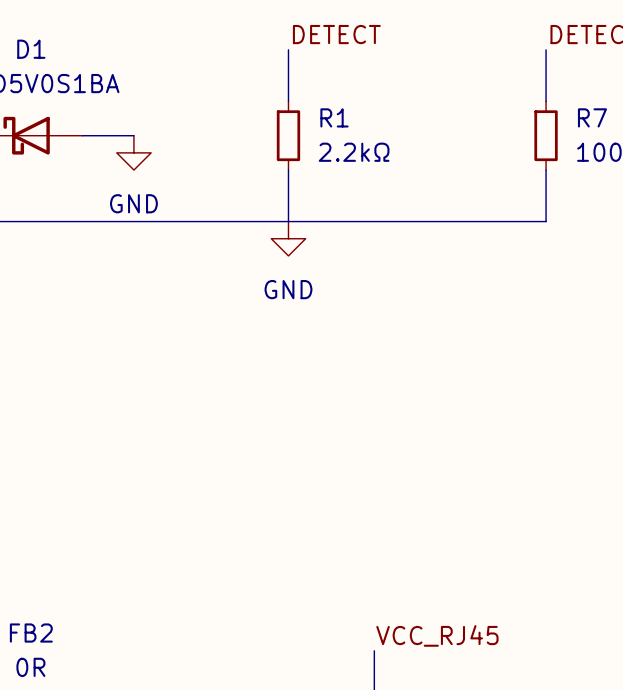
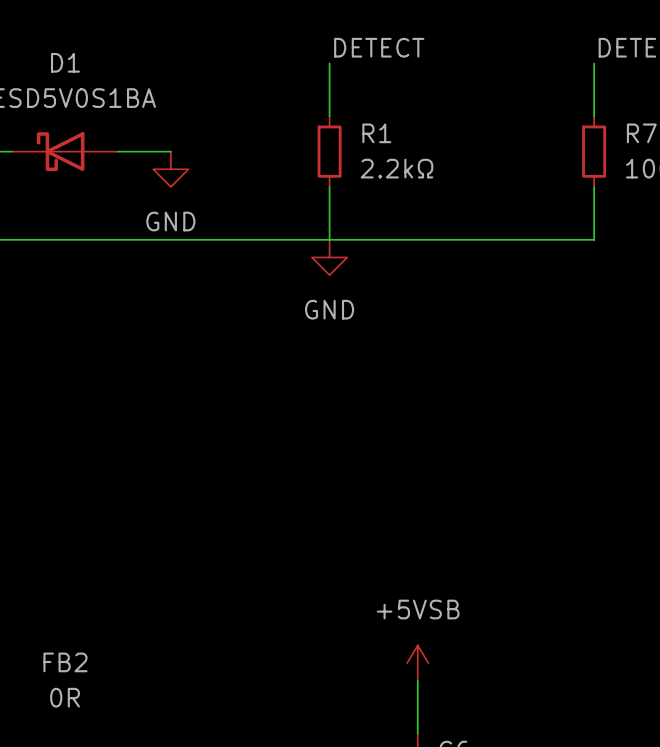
power symbol: none -> +5VSB (417, 663)
label: VCC_RJ45 (437, 635) -> none

